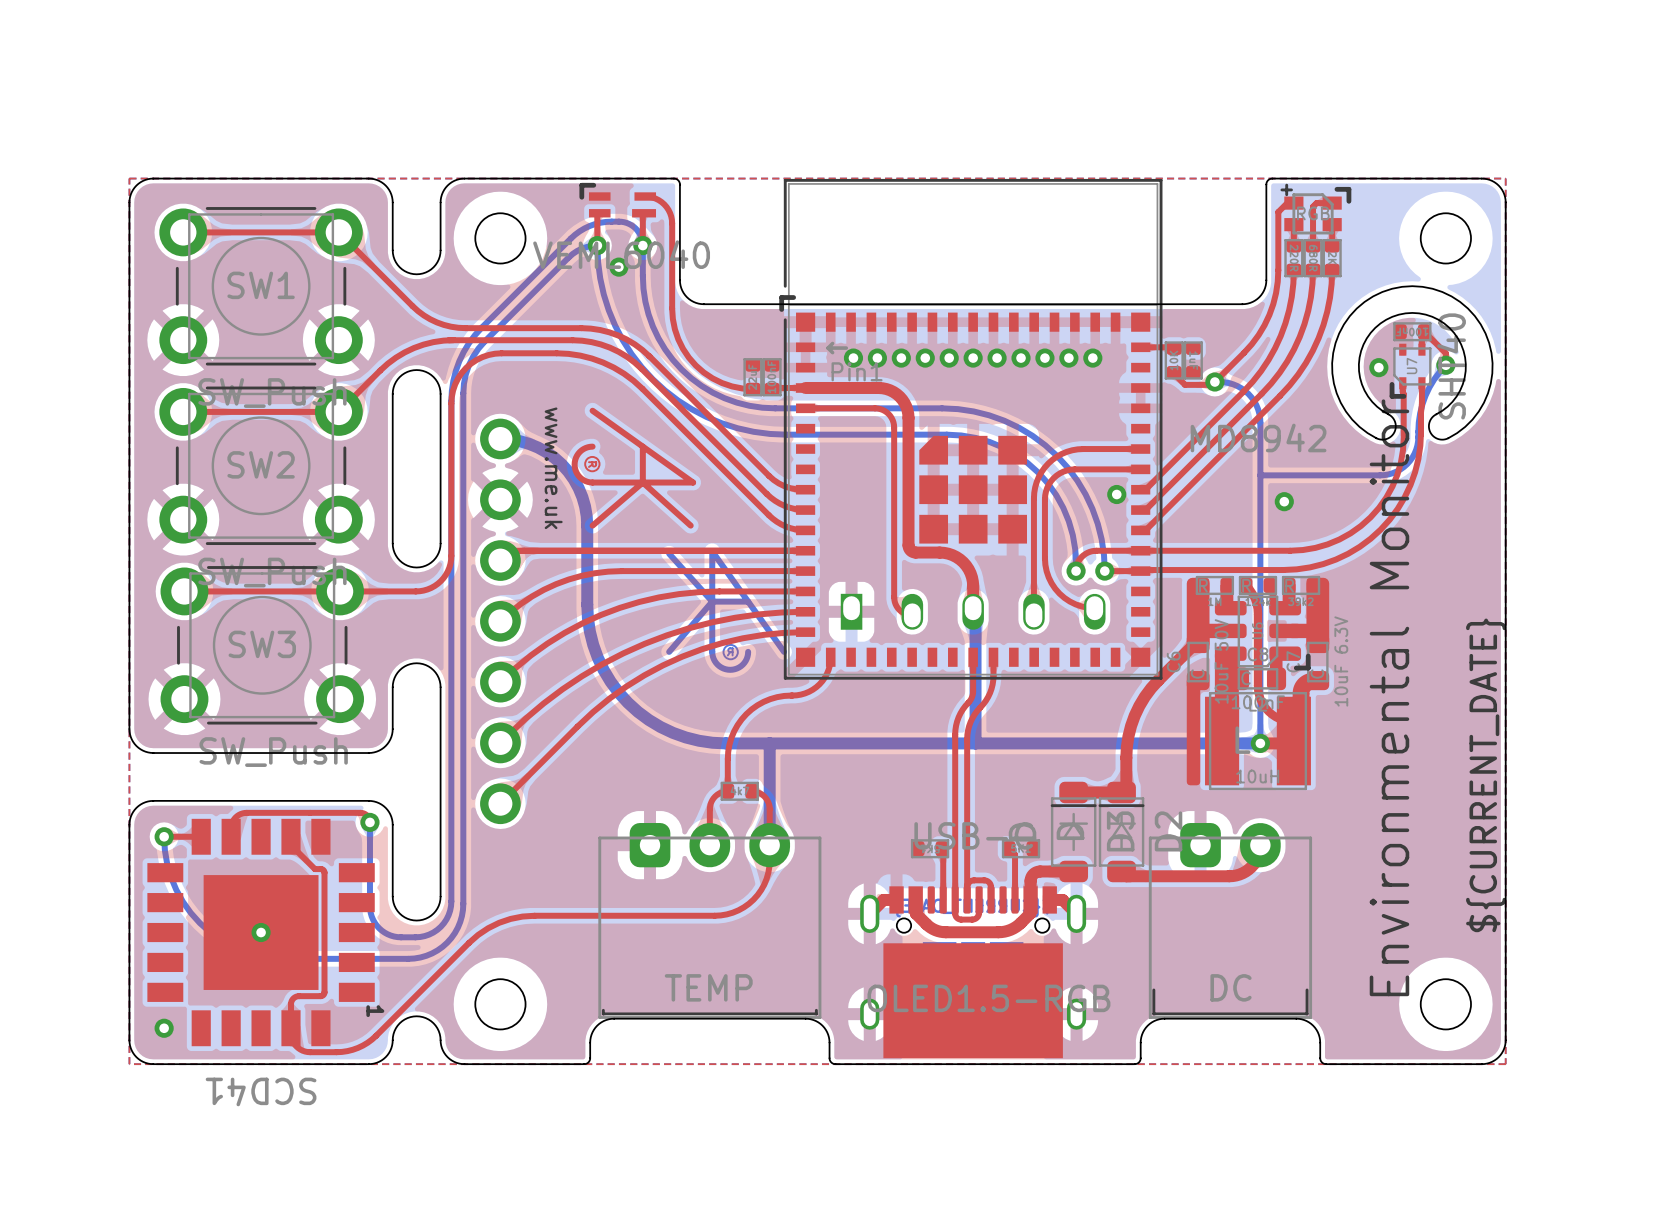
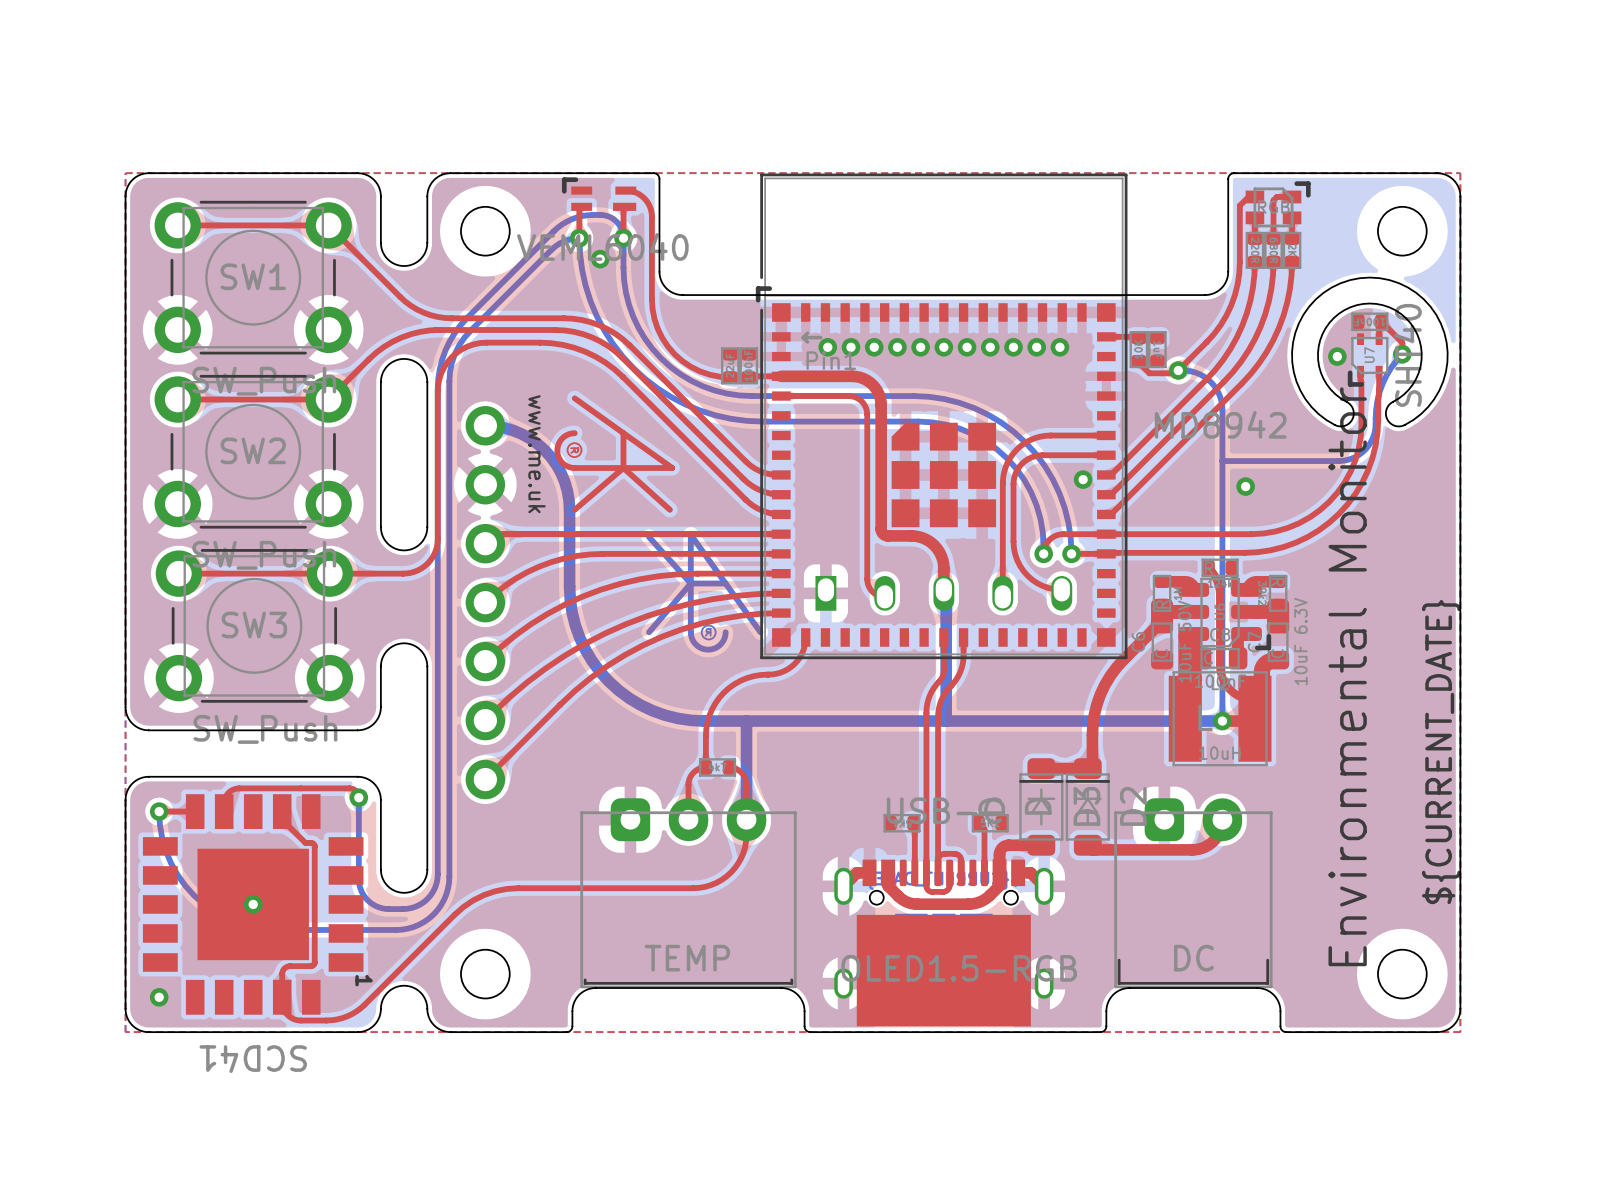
part footprint: [1280, 183, 1352, 235] -> [1245, 181, 1311, 228]
drawing: [1195, 575, 1235, 596] -> none
drawing: [1281, 575, 1321, 596] -> none
part footprint: [1186, 577, 1330, 786] -> [1151, 560, 1290, 762]
drawing: none -> [1152, 574, 1172, 612]
drawing: none -> [1268, 574, 1288, 612]

